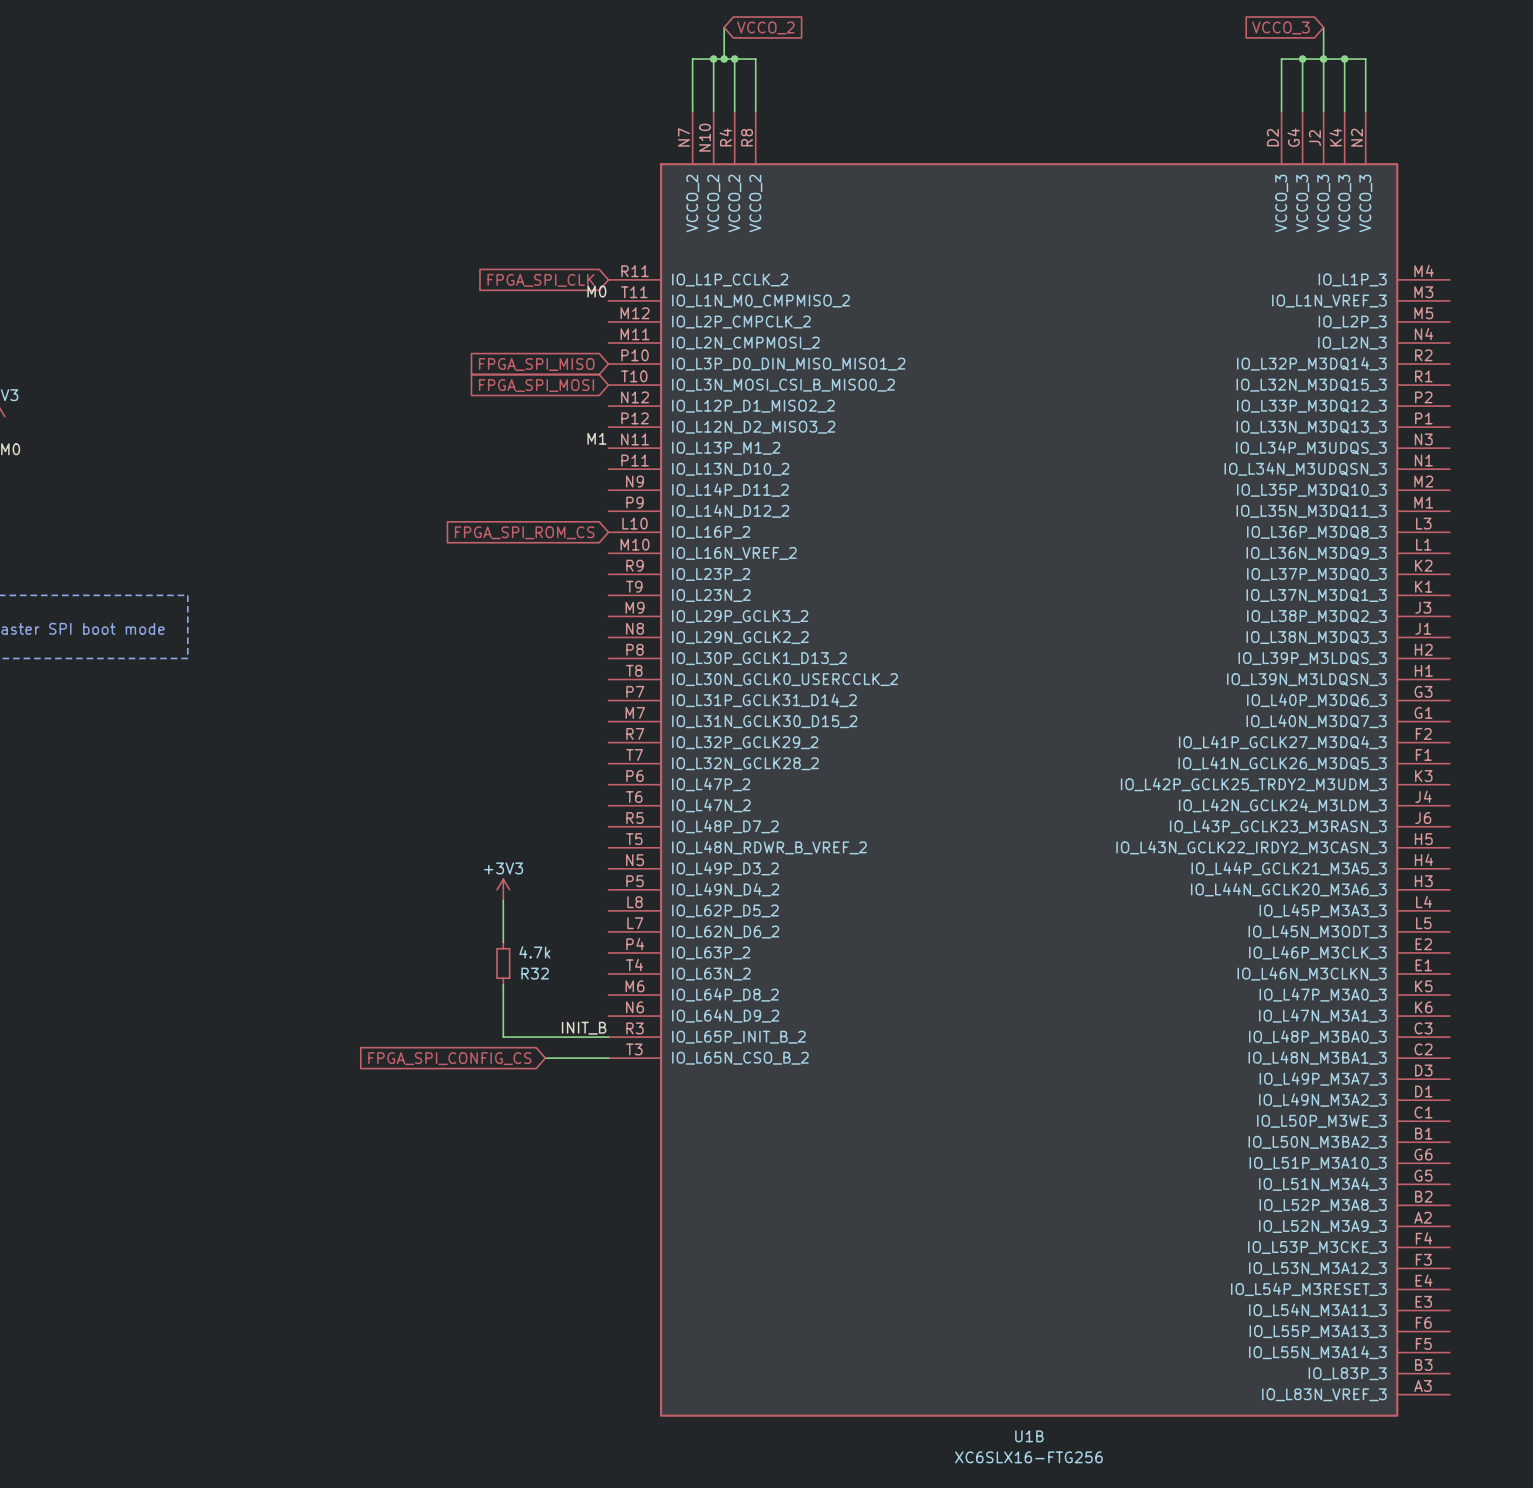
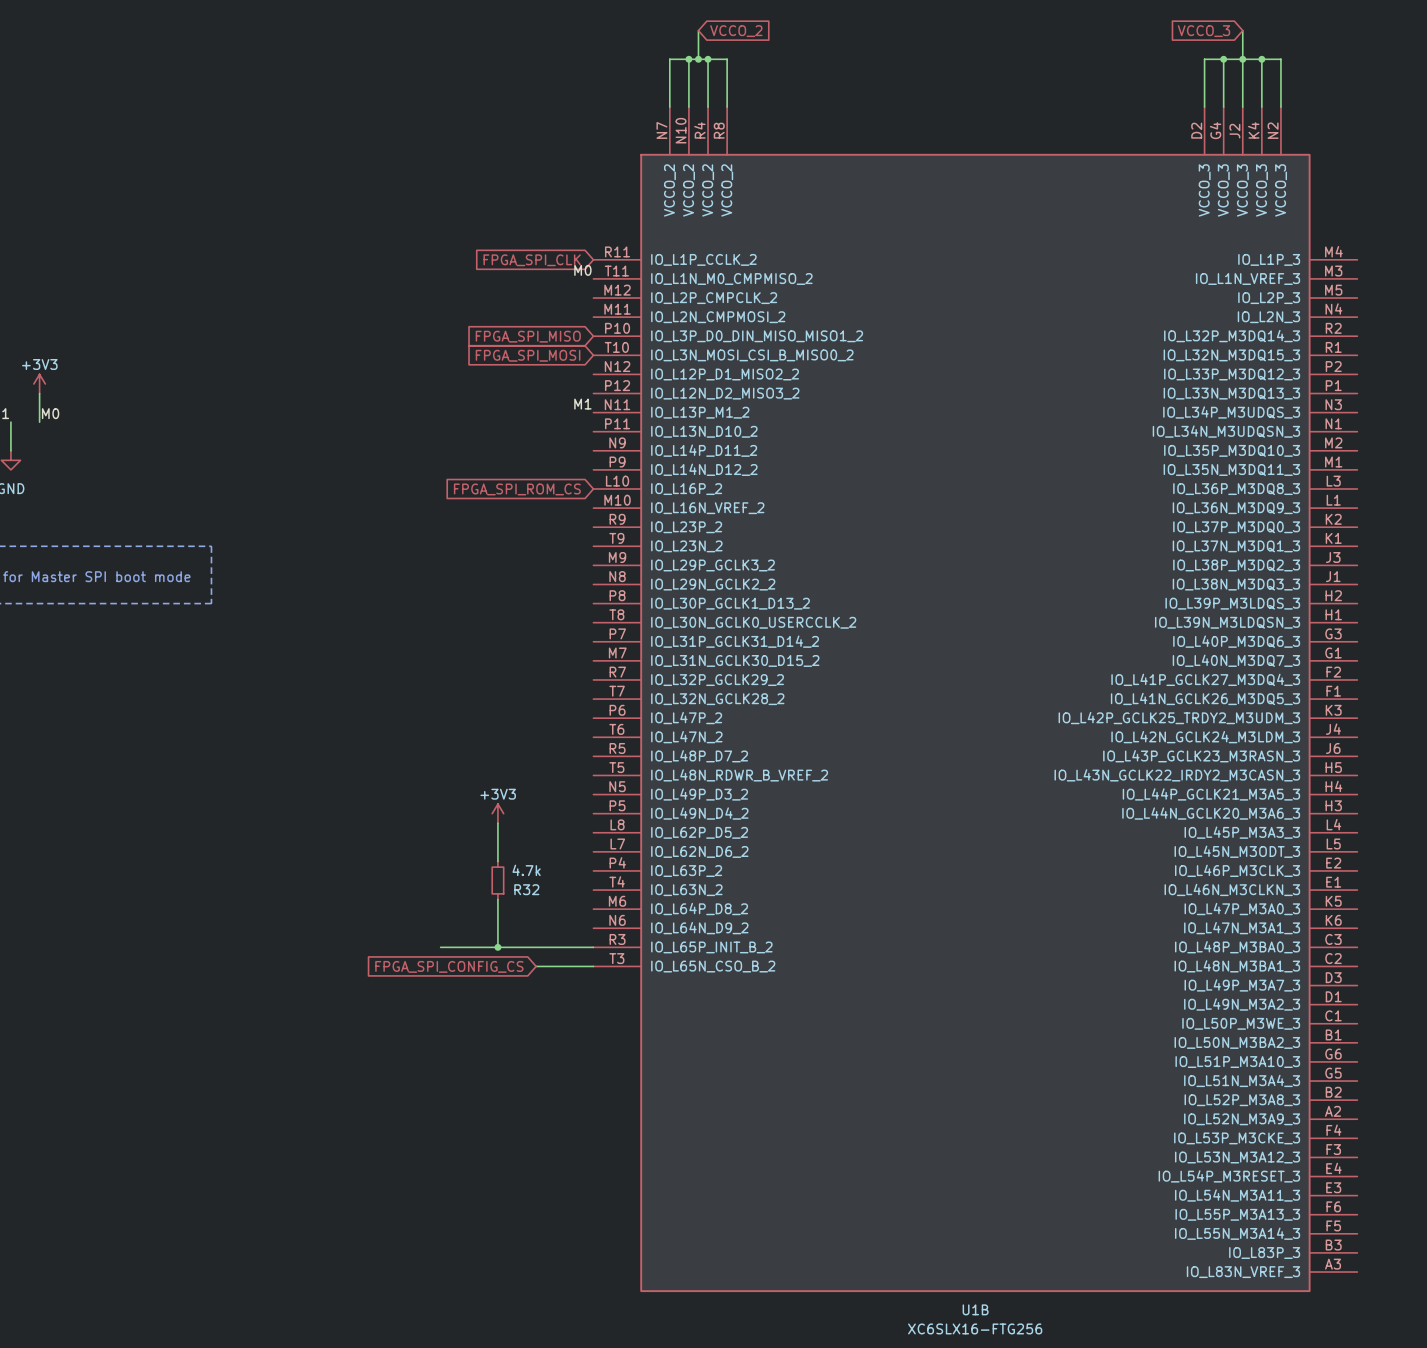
label: INIT_B (584, 1028) -> none
wire: none -> (440, 947) (497, 947)
junction: none -> (497, 947)

